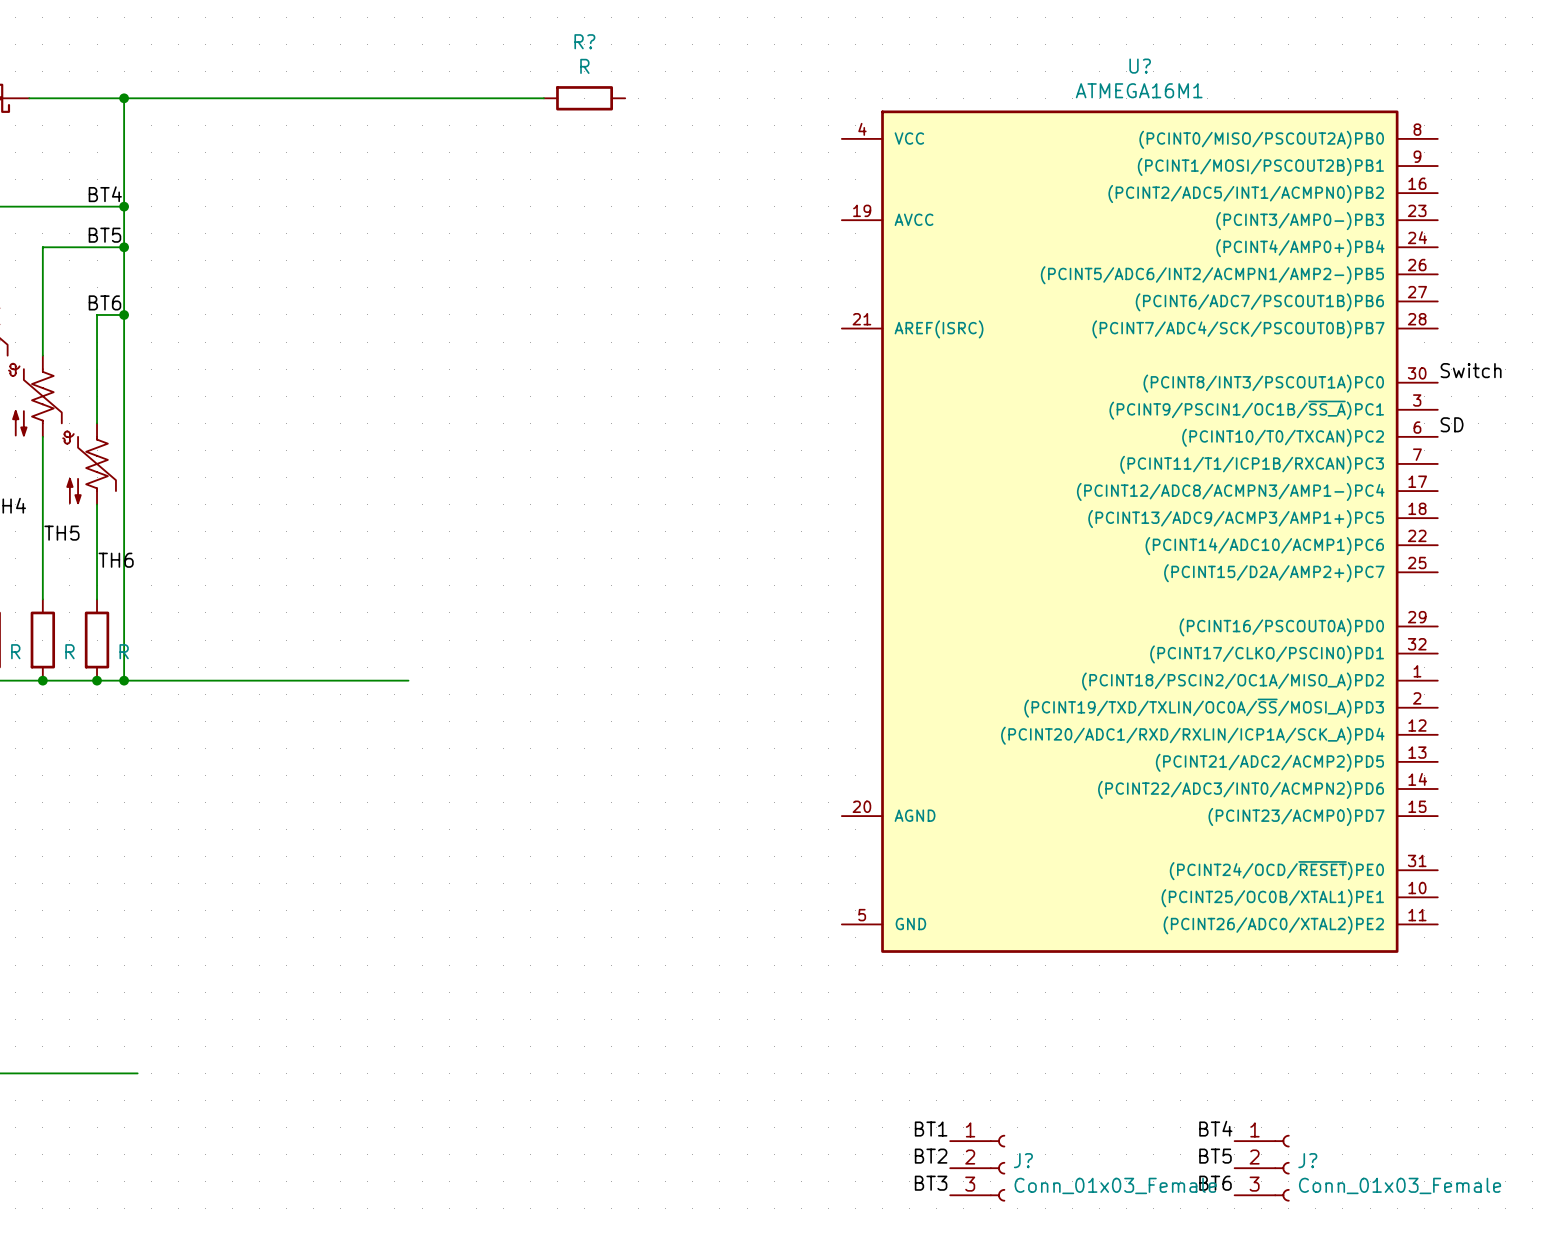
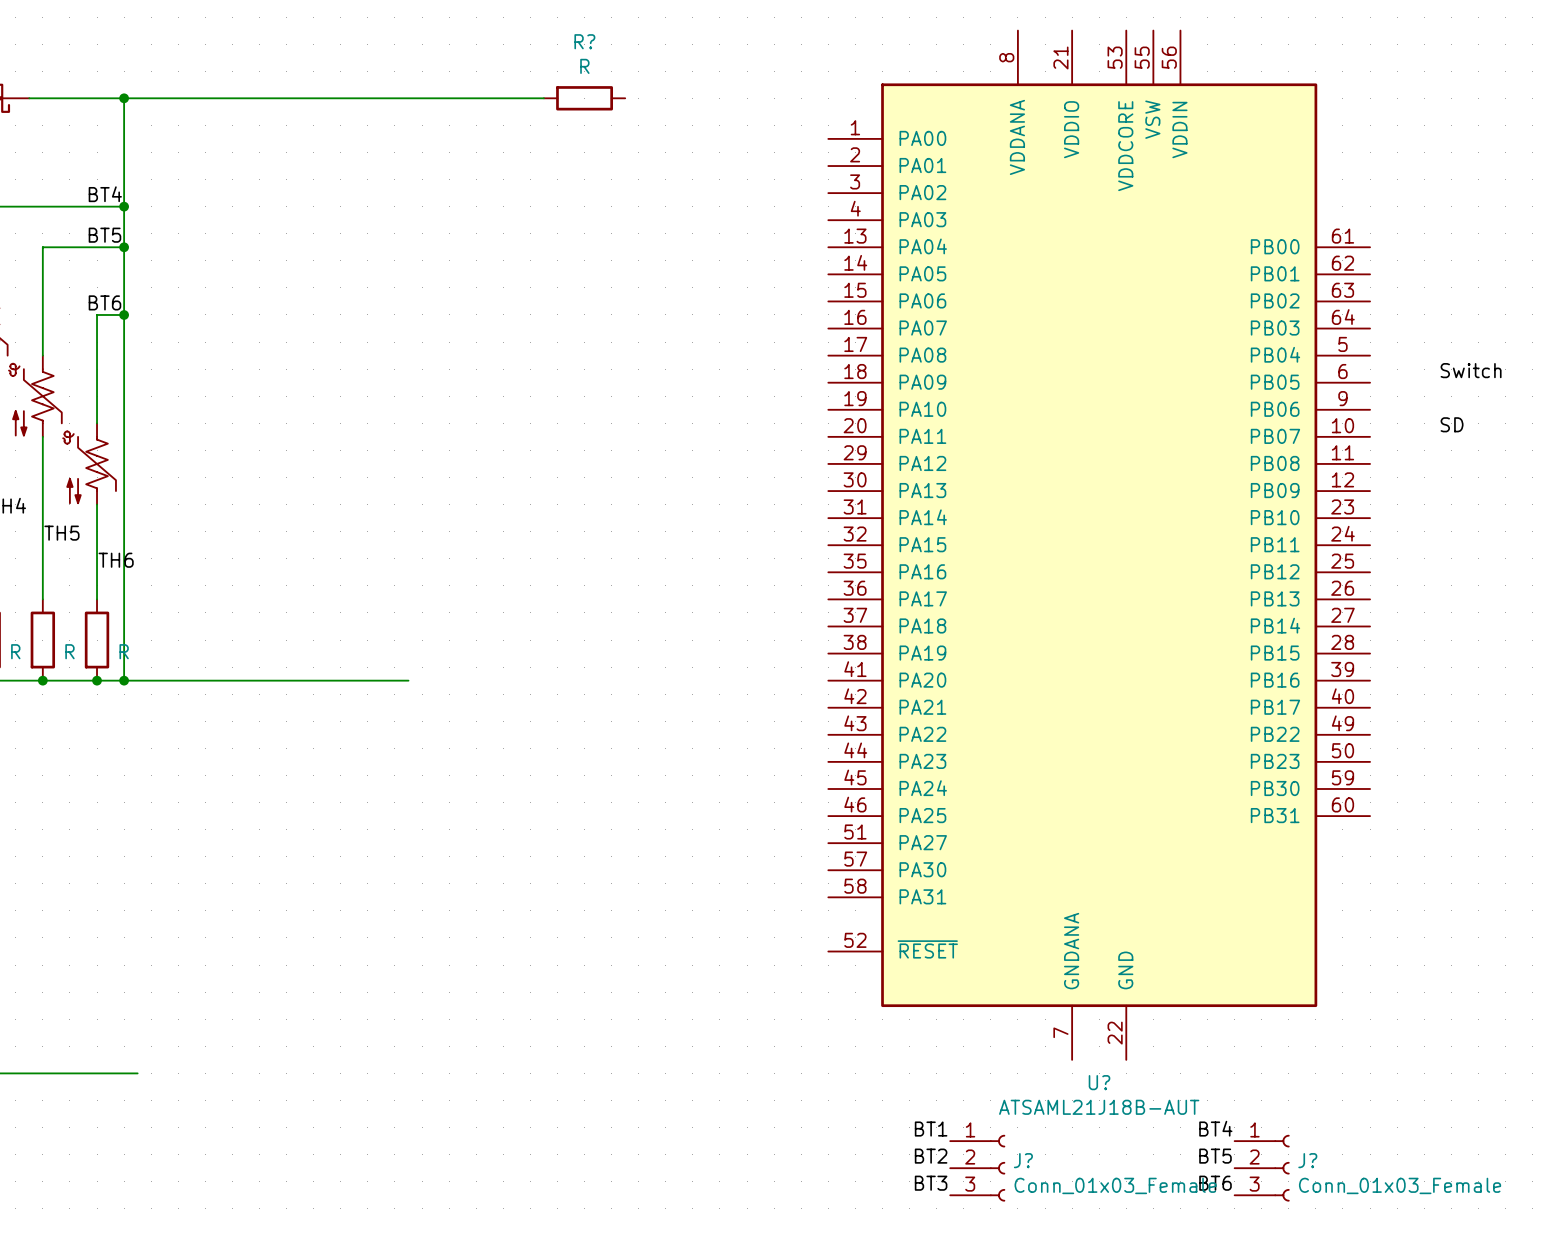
U?: ATMEGA16M1 (1139, 531) -> none
U?: none -> ATSAML21J18B-AUT (1099, 545)

